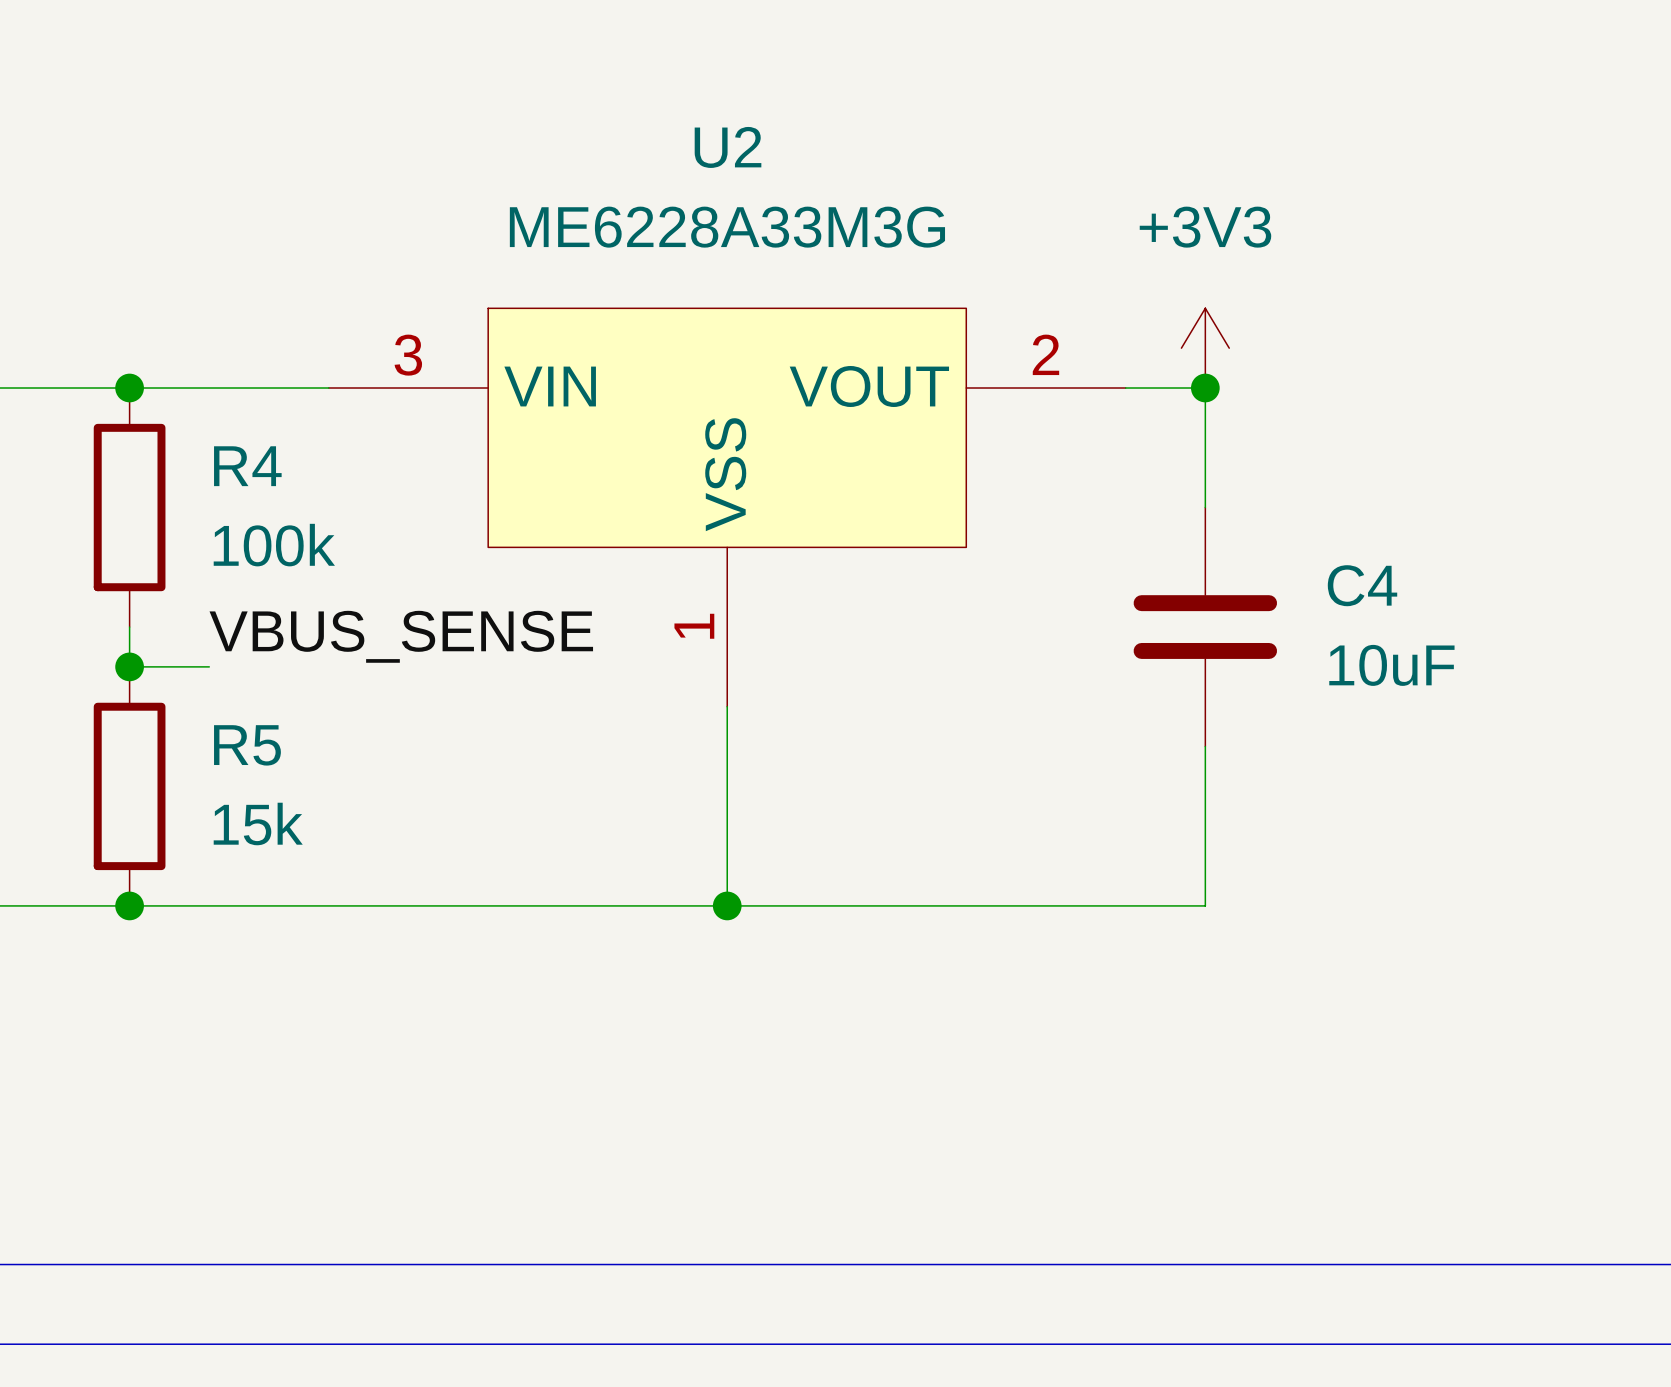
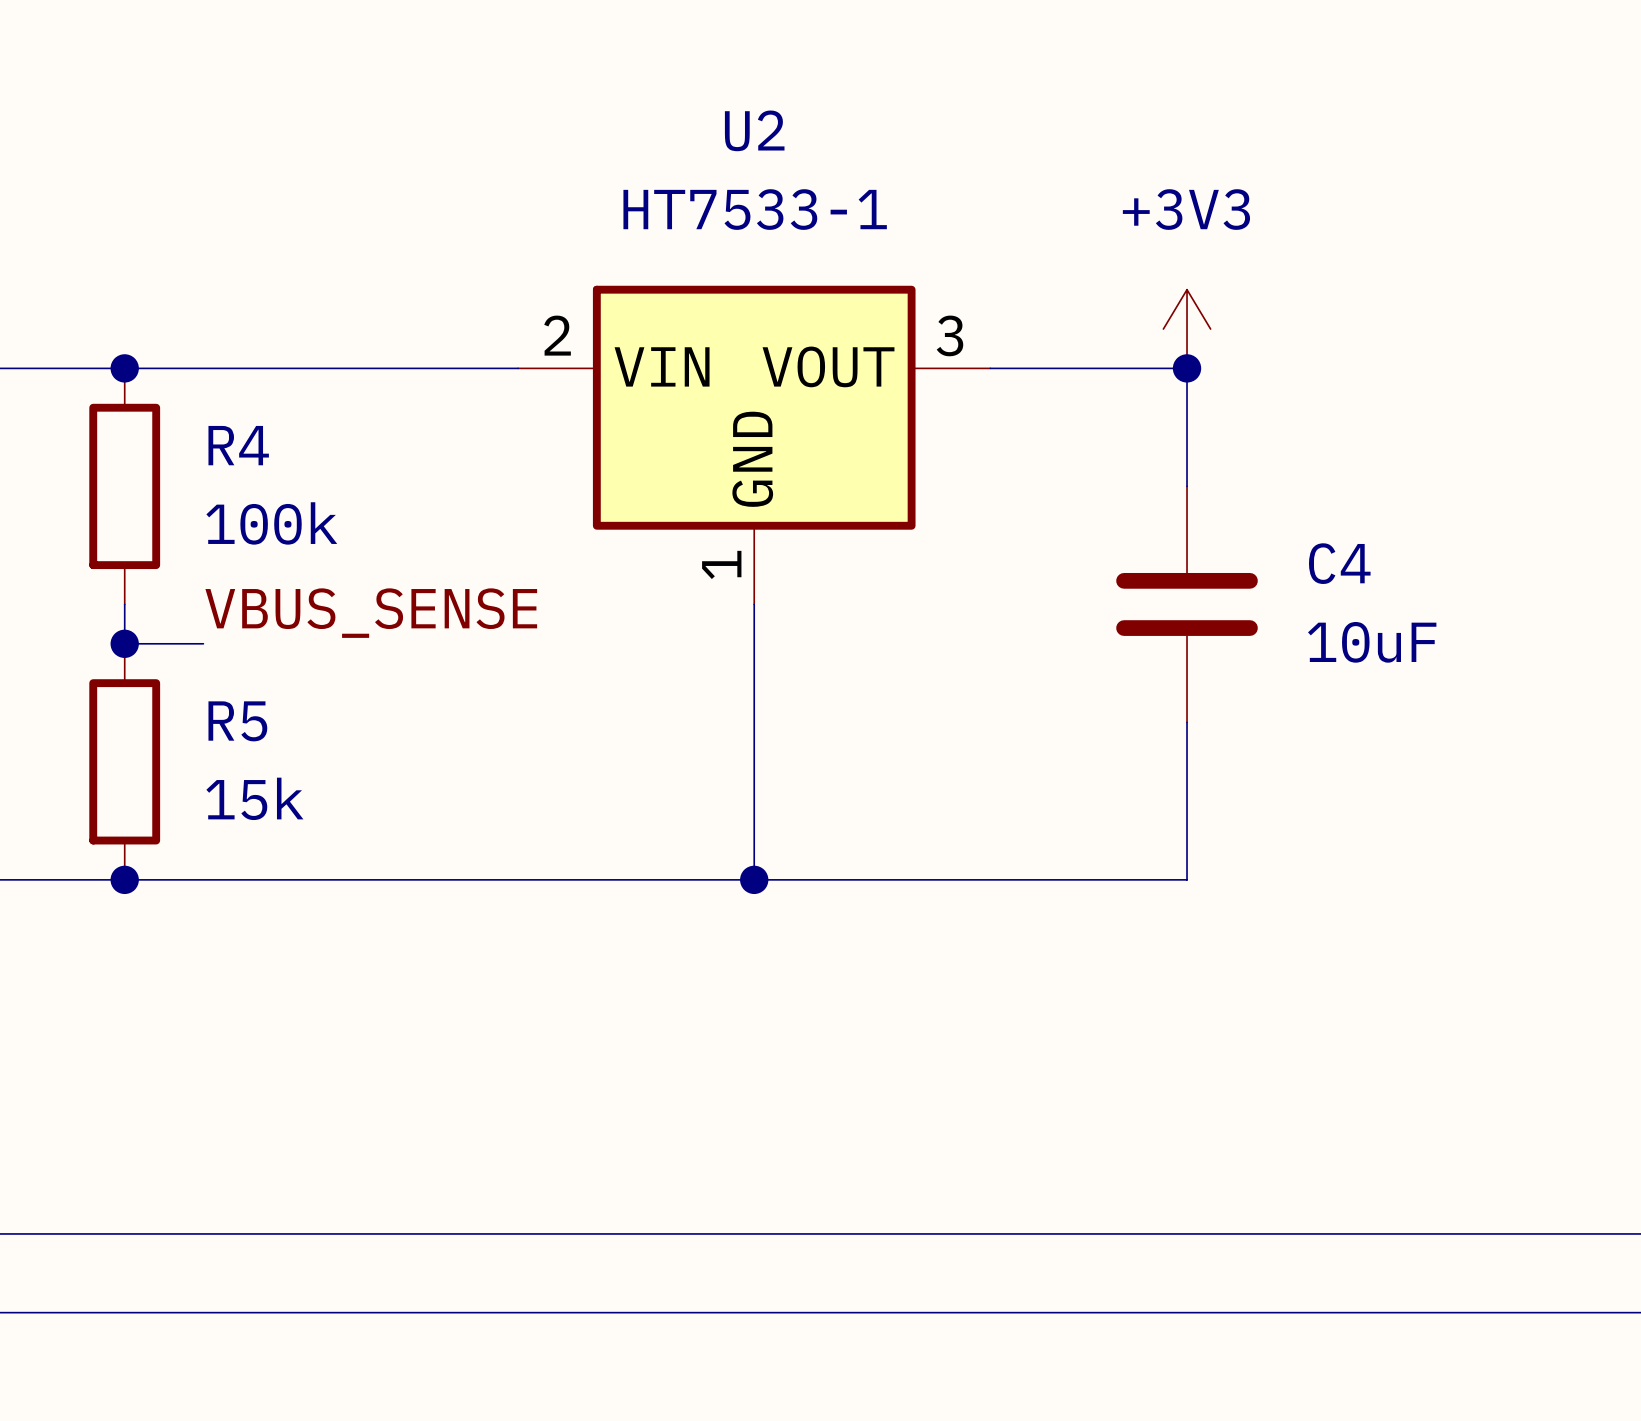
U2 value: ME6228A33M3G (727, 227) -> HT7533-1 (755, 209)
U2 symbol: [328, 308, 1126, 707] -> [518, 285, 991, 605]
wire: none -> (754, 604) (754, 879)
wire: (727, 706) (727, 905) -> none
junction position: (727, 905) -> (754, 879)

